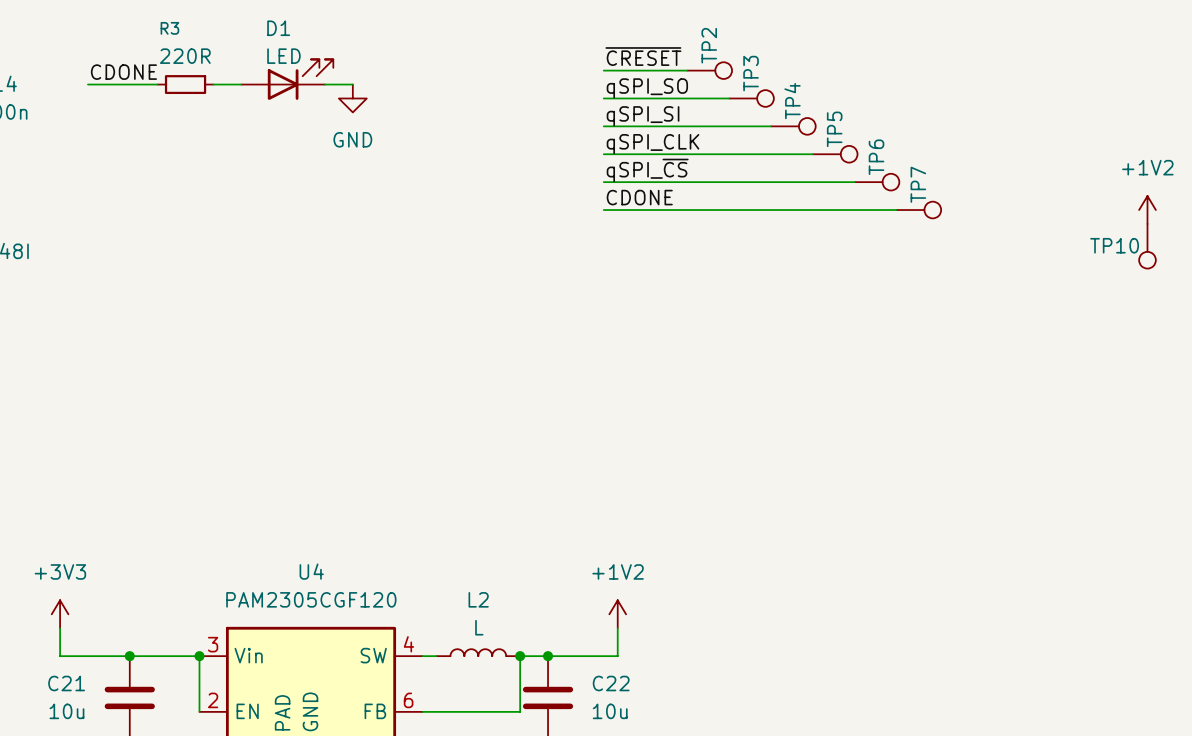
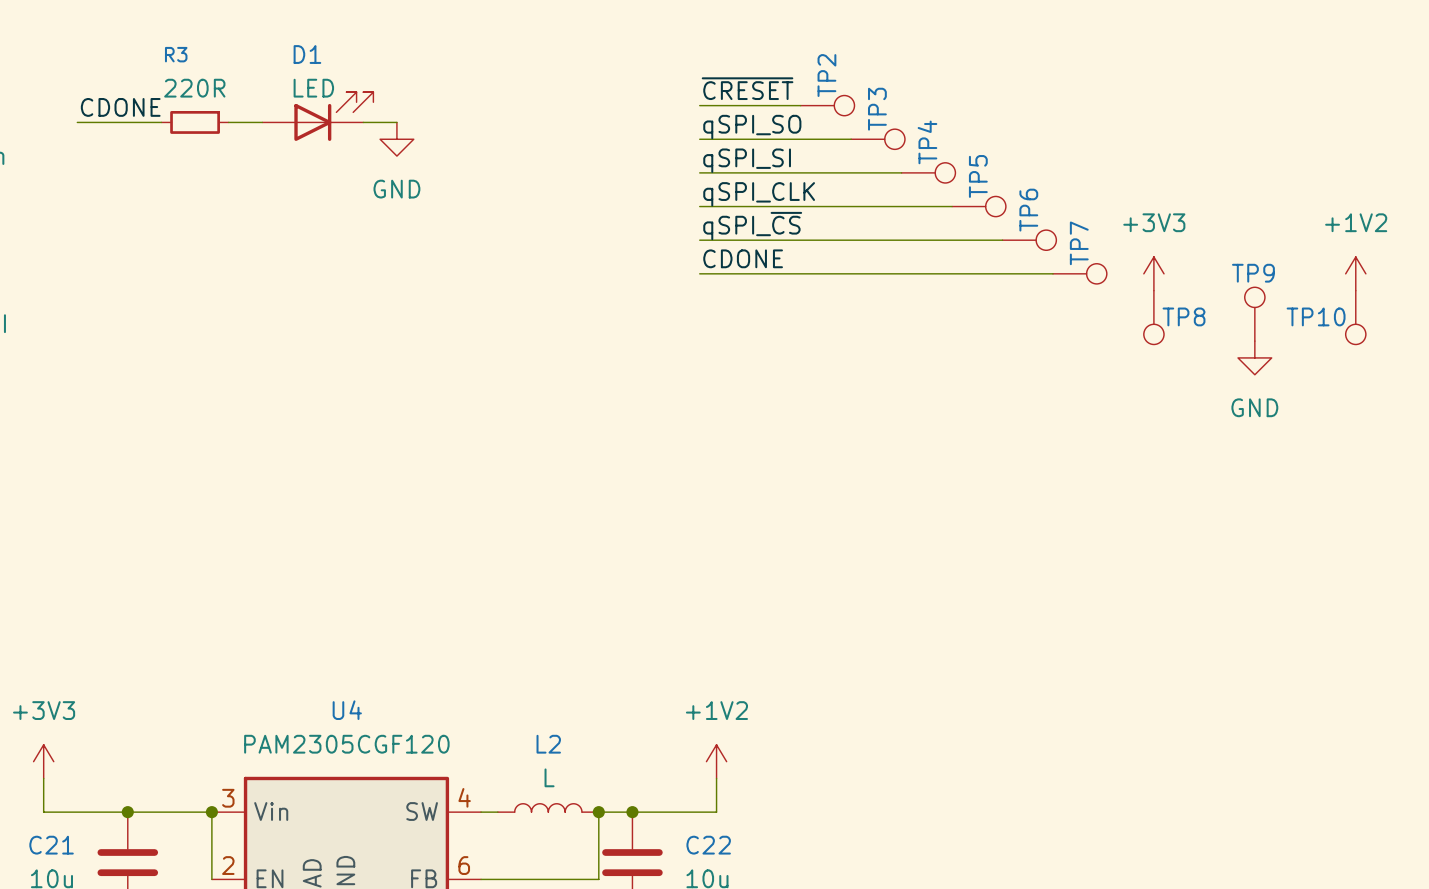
power symbol: none -> +3V3 (1153, 273)
TP9: none -> (1254, 314)
TP8: none -> (1153, 317)
power symbol: none -> GND (1254, 357)

